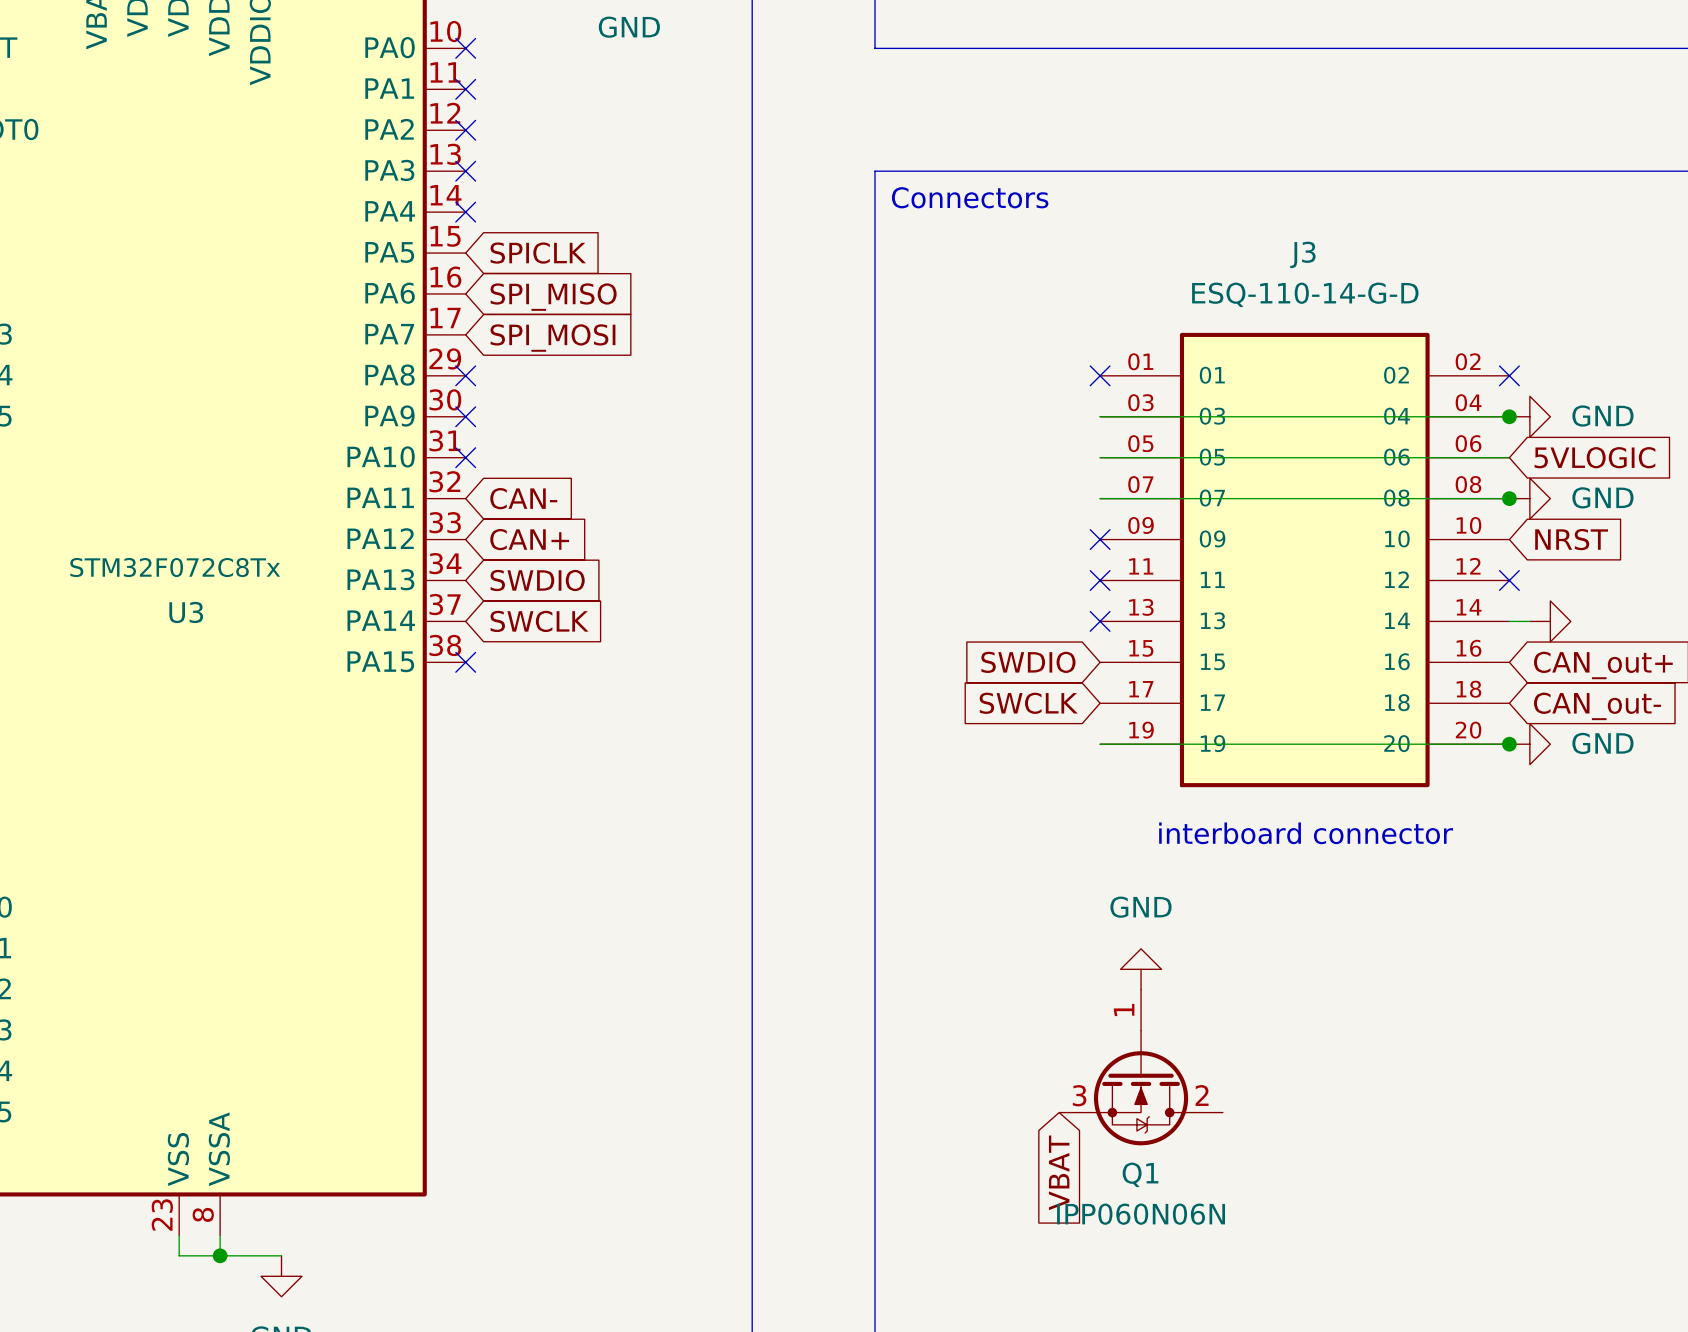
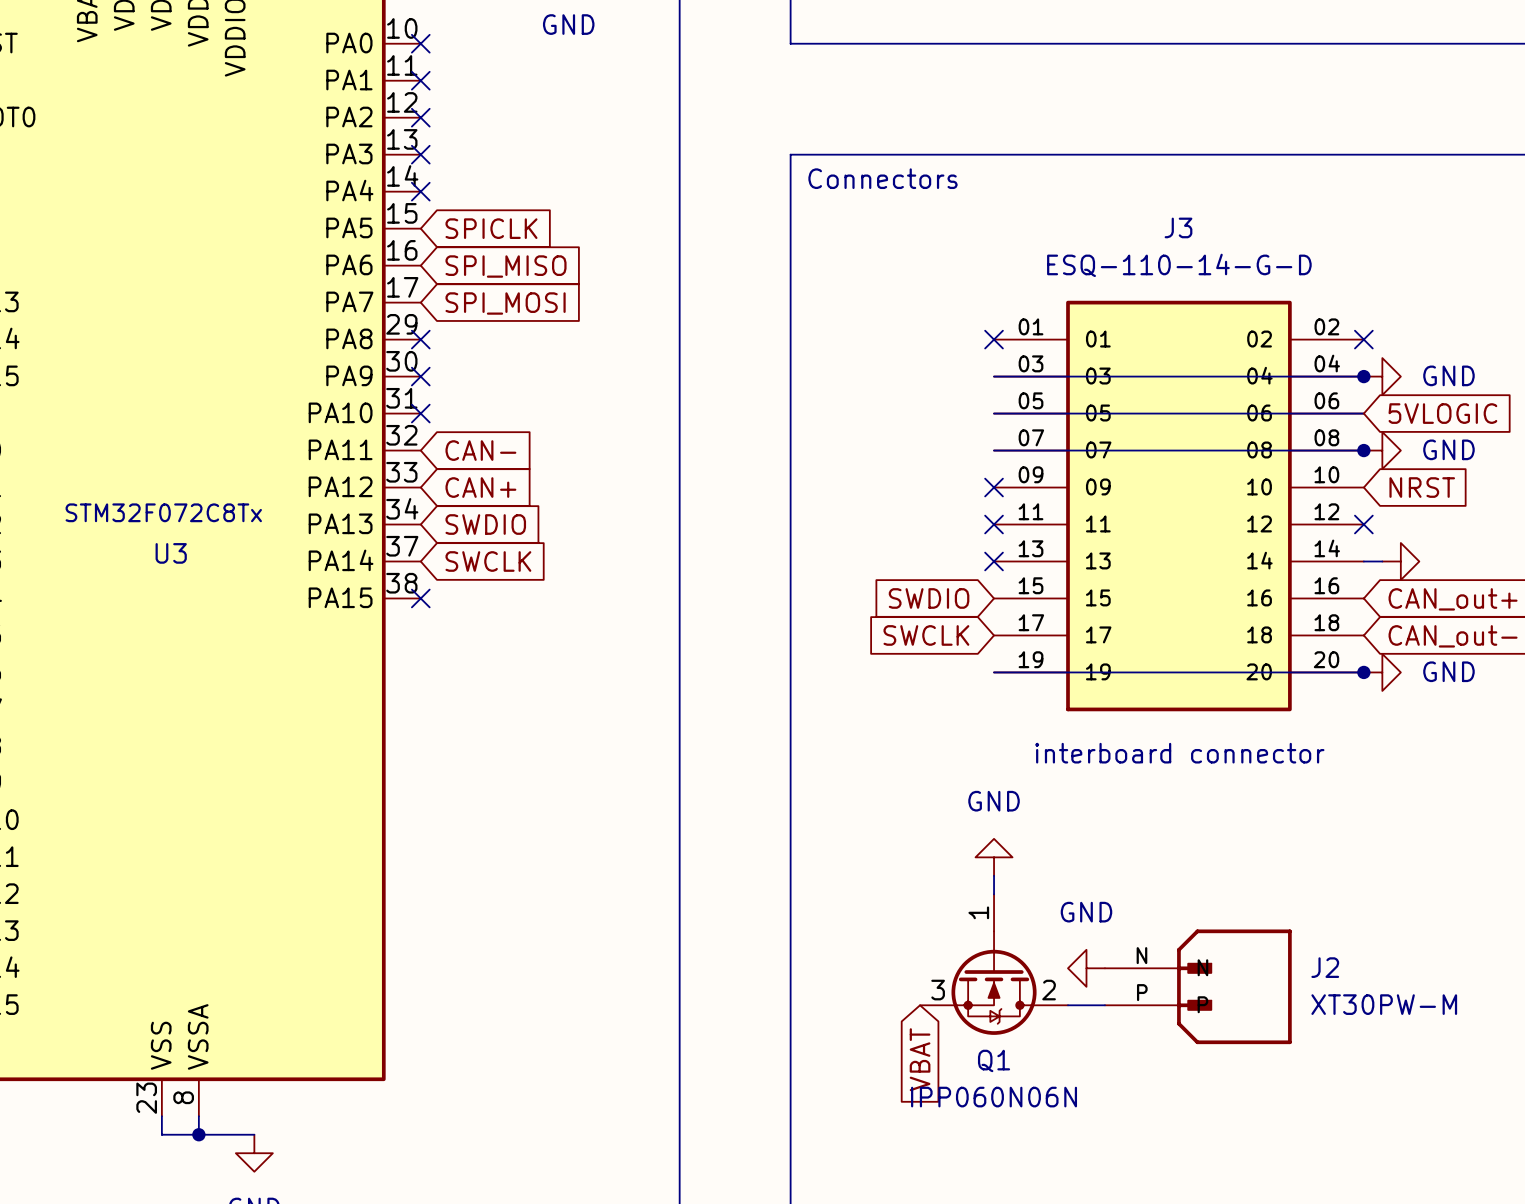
wire: none -> (994, 875) (994, 894)
power symbol position: GND (1141, 969) -> GND (994, 857)
Q1 position: (1141, 1067) -> (994, 964)
power symbol: none -> GND (1086, 968)
J2: none -> XT30PW-M (1198, 986)
global label position: VBAT (1059, 1172) -> VBAT (920, 1059)

